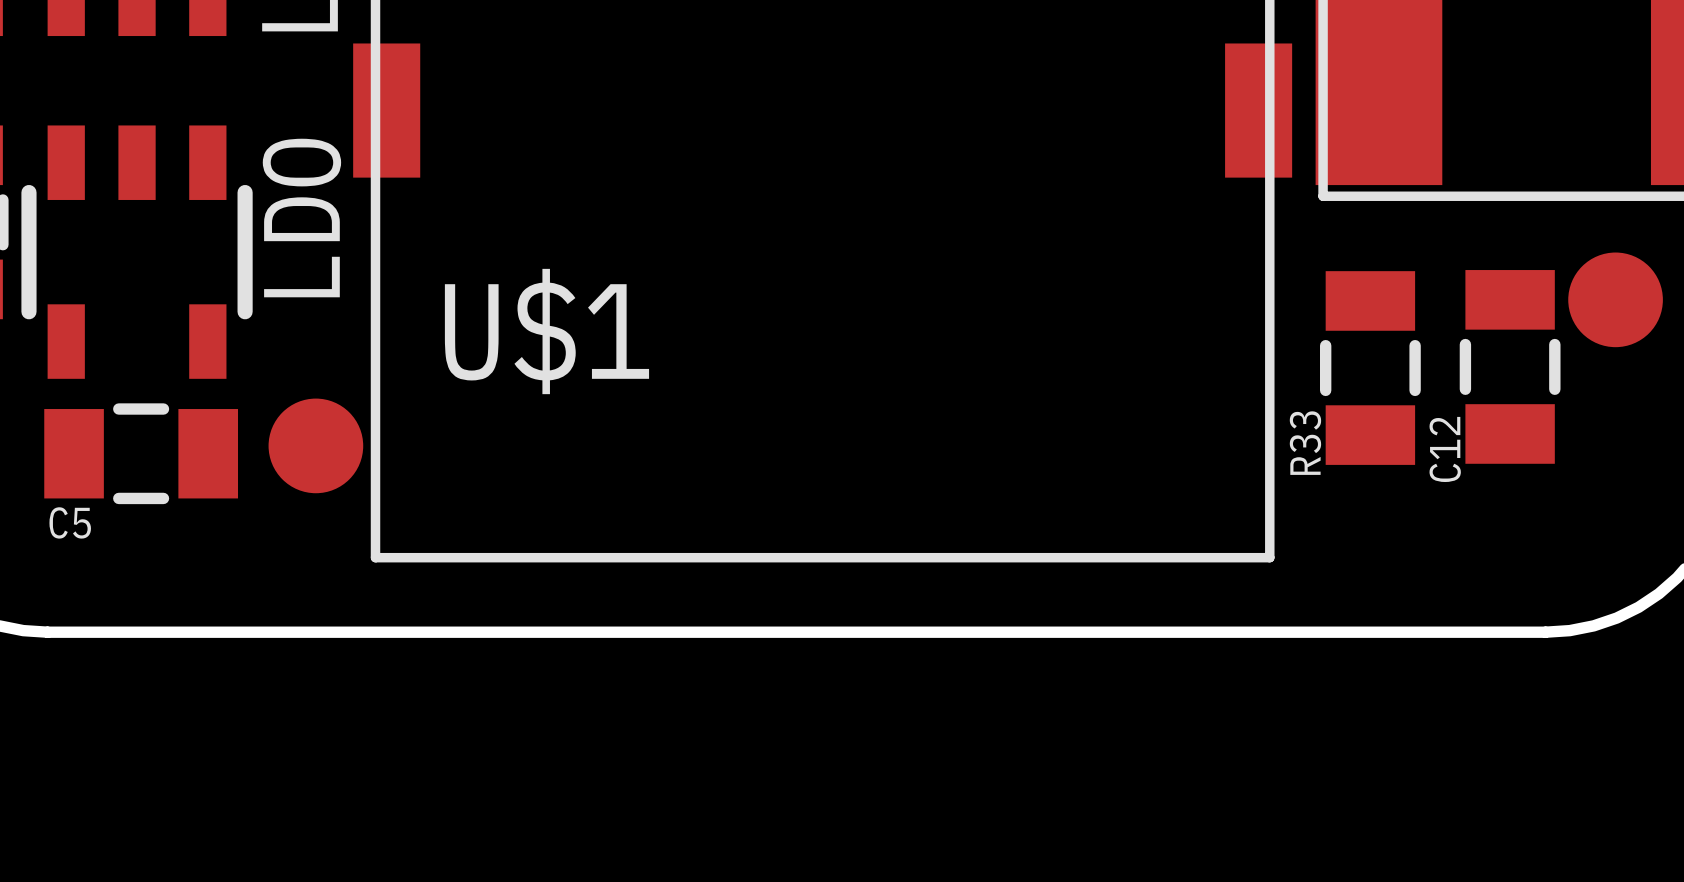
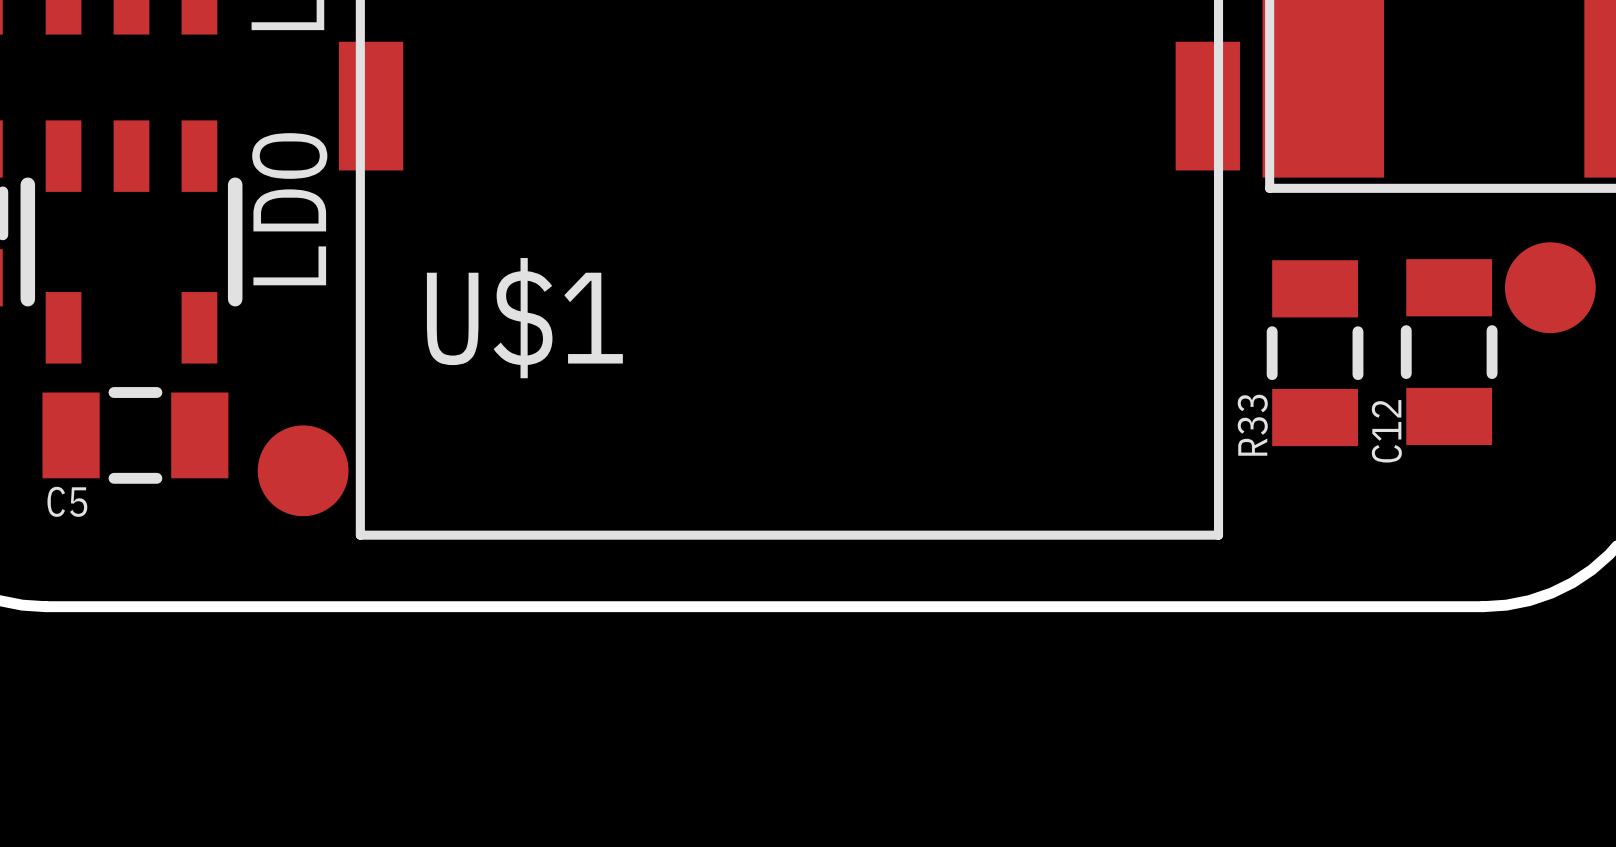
part position: (315, 445) -> (303, 470)

